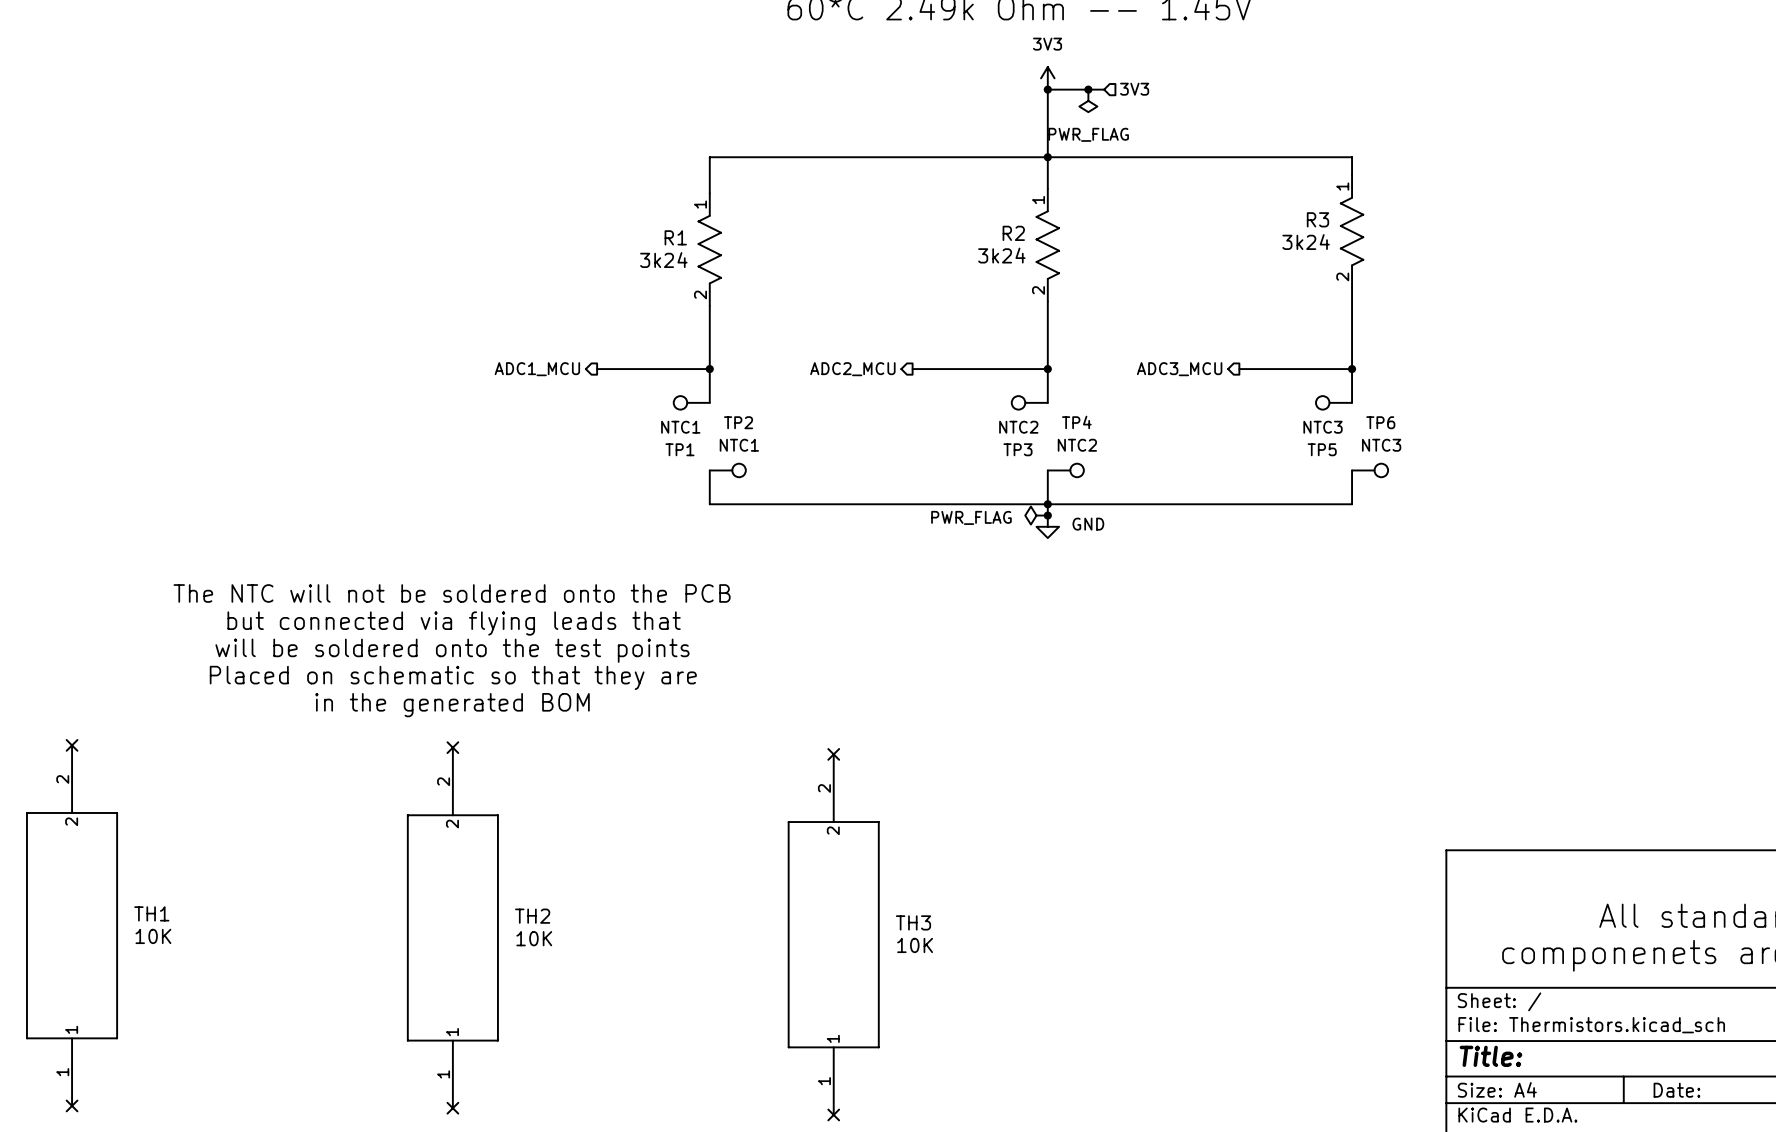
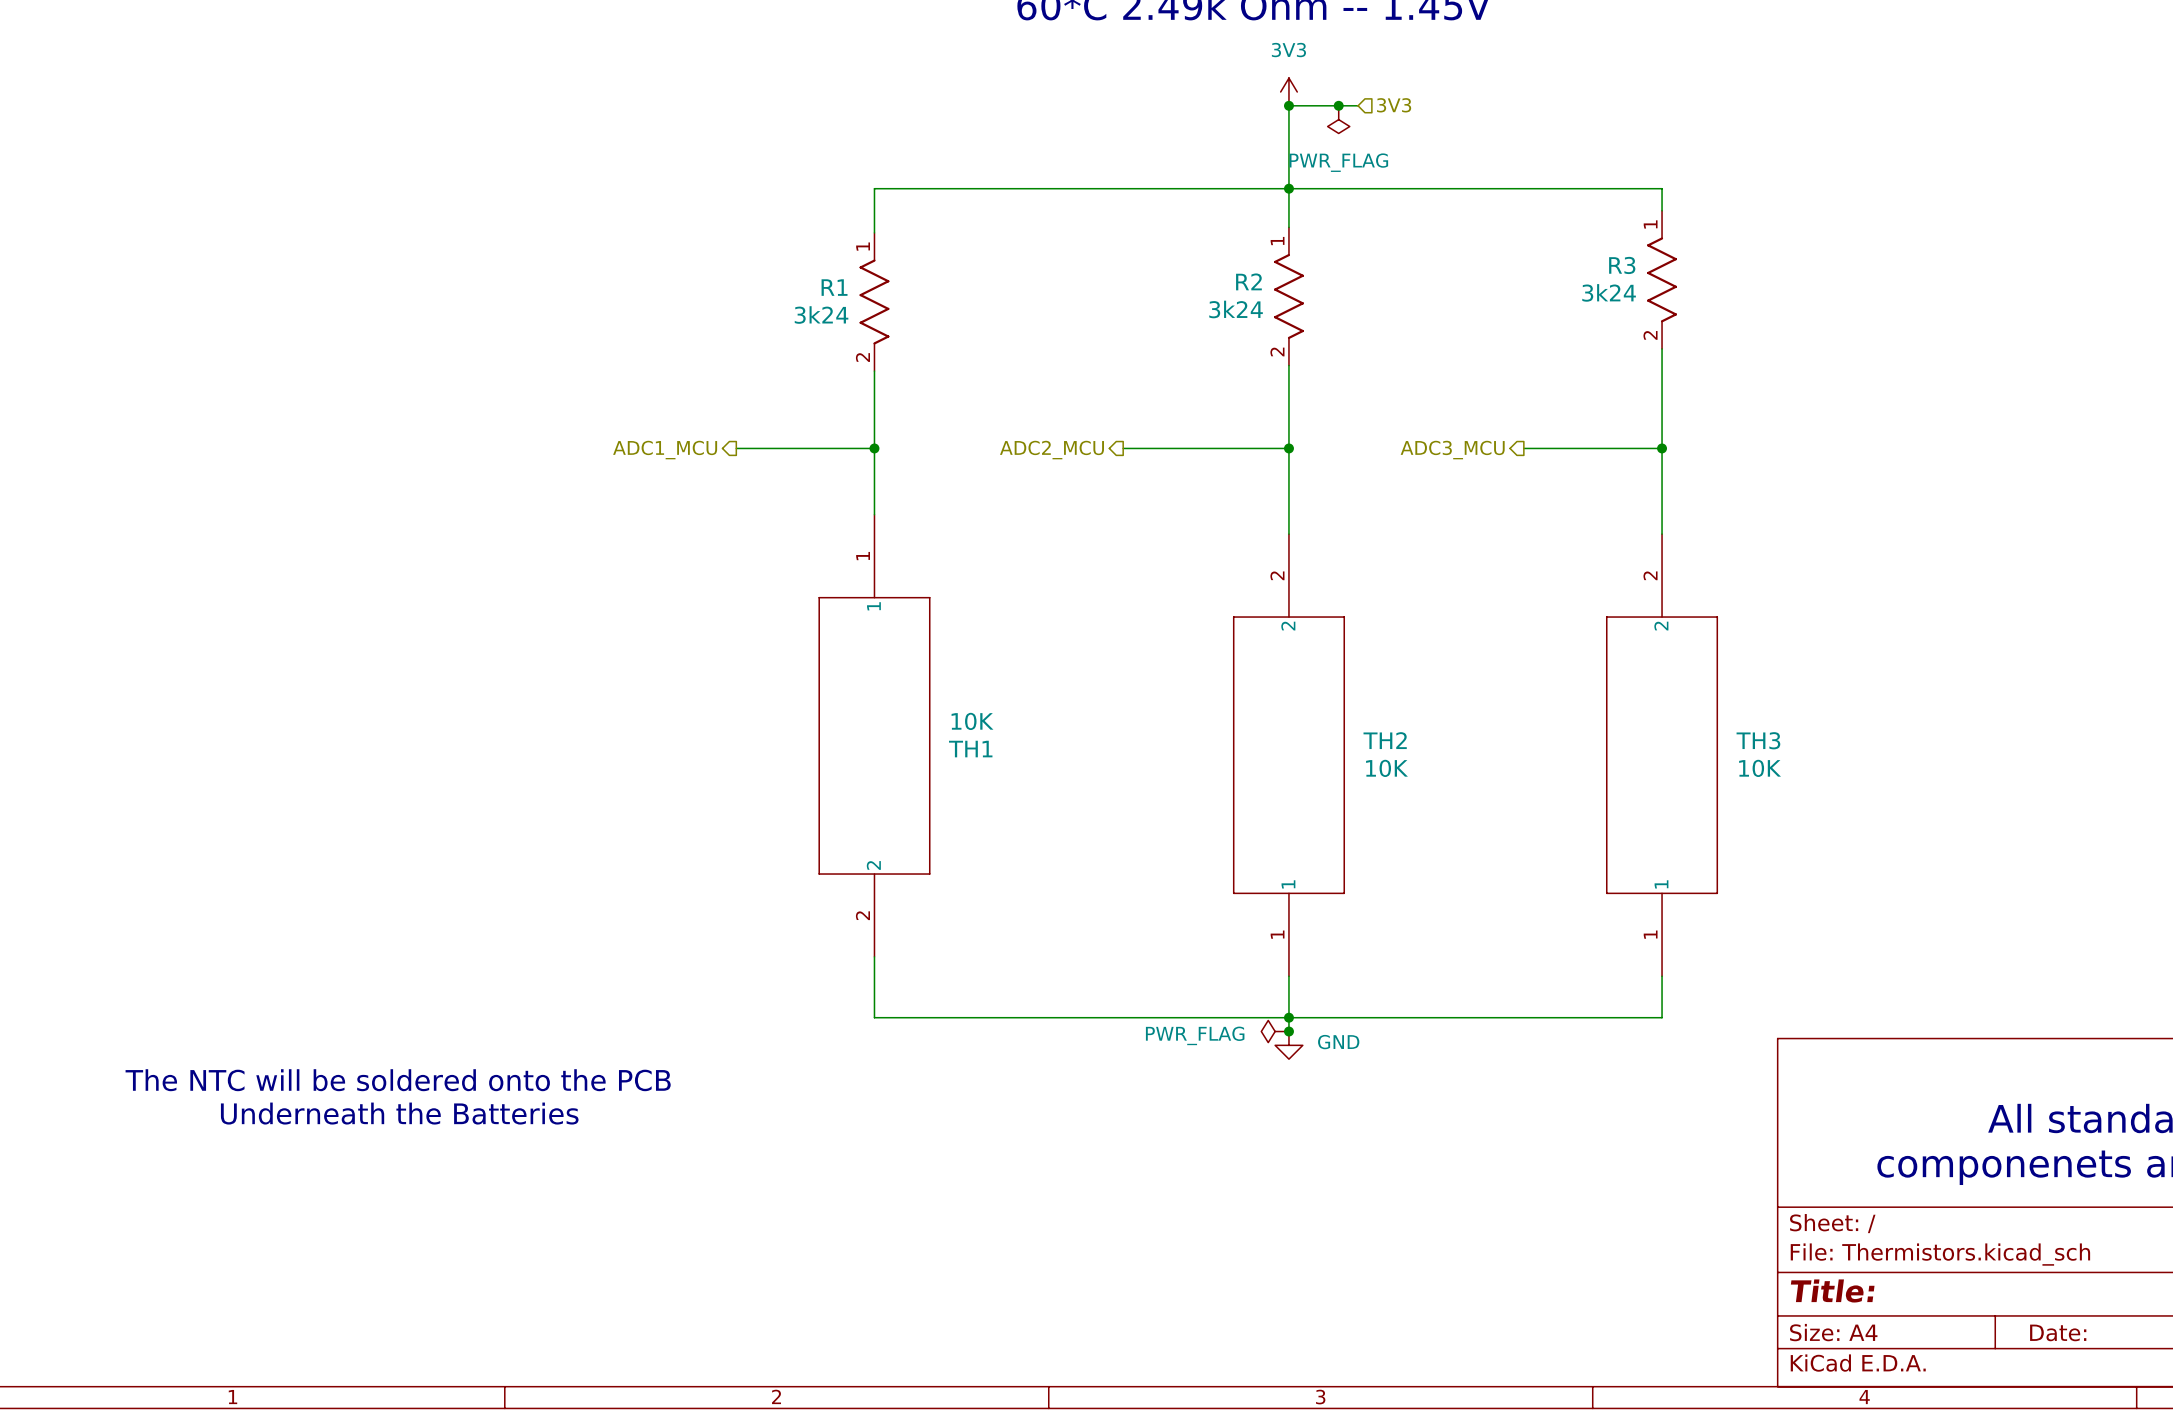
TP1: NTC1 (691, 402) -> none
wire: none -> (874, 489) (874, 514)
TP3: NTC2 (1029, 402) -> none
wire: none -> (1288, 489) (1288, 534)
TP5: NTC3 (1334, 402) -> none
wire: none -> (1662, 489) (1662, 534)
wire: (709, 470) (709, 504) (1352, 504) (1352, 470) -> none
TP2: NTC1 (727, 470) -> none
TP4: NTC2 (1065, 470) -> none
TP6: NTC3 (1370, 470) -> none
junction: (1047, 504) -> none
power symbol: PWR_FLAG (1036, 515) -> none
junction: (1047, 515) -> none
power symbol: GND (1047, 526) -> none
text: The NTC will not be soldered onto the PCB (452, 593) -> none
text: but connected via flying leads that (454, 623) -> none
text: will be soldered onto the test points (452, 650) -> none
text: Placed on schematic so that they are (453, 677) -> none
text: in the generated BOM (452, 705) -> none
no-connect mark: (72, 745) -> none
no-connect mark: (452, 747) -> none
no-connect mark: (833, 754) -> none
wire: none -> (874, 956) (874, 1017) (1662, 1017) (1662, 976)
wire: none -> (1288, 976) (1288, 1031)
junction: none -> (1288, 1017)
power symbol: none -> PWR_FLAG (1275, 1031)
junction: none -> (1288, 1031)
power symbol: none -> GND (1288, 1045)
text: none -> The NTC will be soldered onto the PCB (398, 1080)
text: none -> Underneath the Batteries (399, 1113)
TH1 name position: TH1 (151, 913) -> TH1 (970, 749)
TH1 rotation: 0° (72, 925) -> 180° (874, 735)
TH1 position: (72, 925) -> (874, 735)
TH2 position: (452, 927) -> (1288, 755)
TH3 position: (833, 934) -> (1662, 755)
TH1 value position: 10K (153, 936) -> 10K (972, 721)
no-connect mark: (72, 1105) -> none
no-connect mark: (452, 1108) -> none
no-connect mark: (833, 1114) -> none

